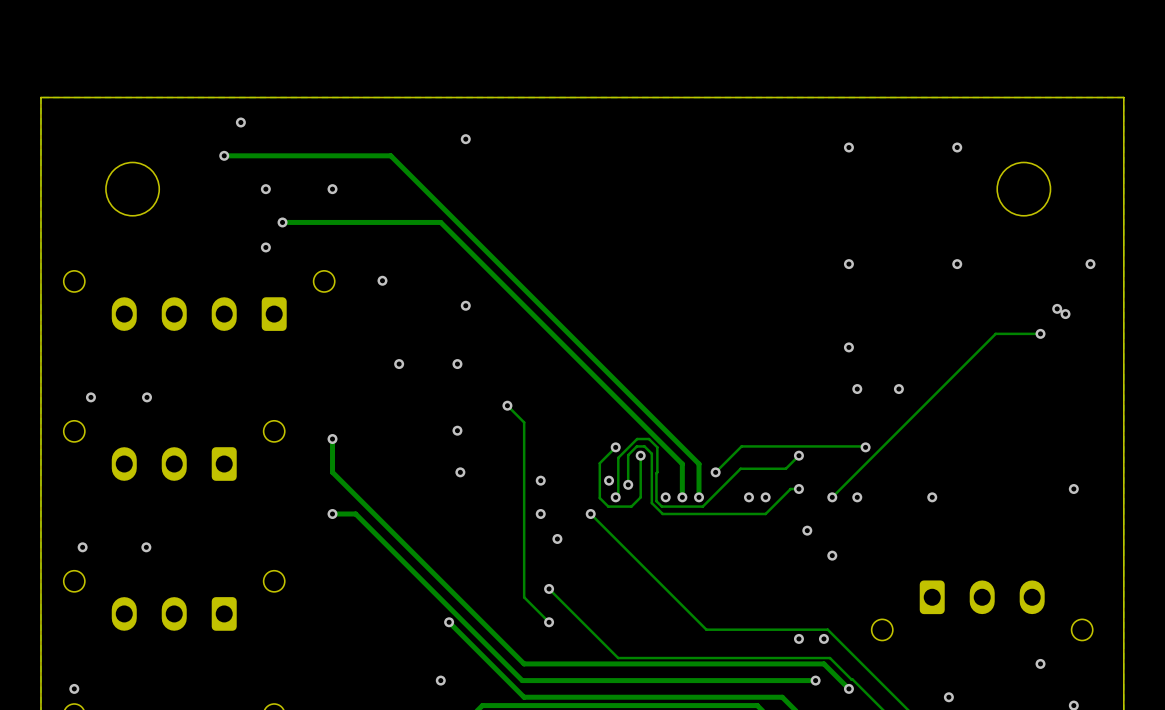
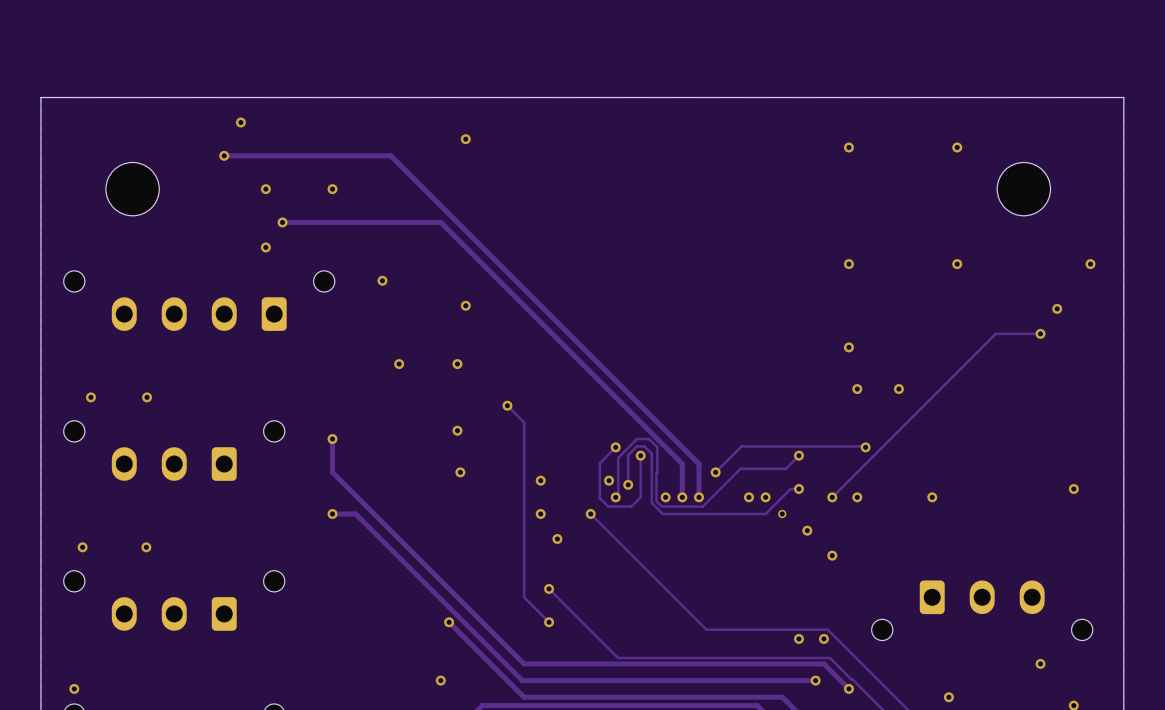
via: (1065, 314) -> none
via: none -> (782, 513)

